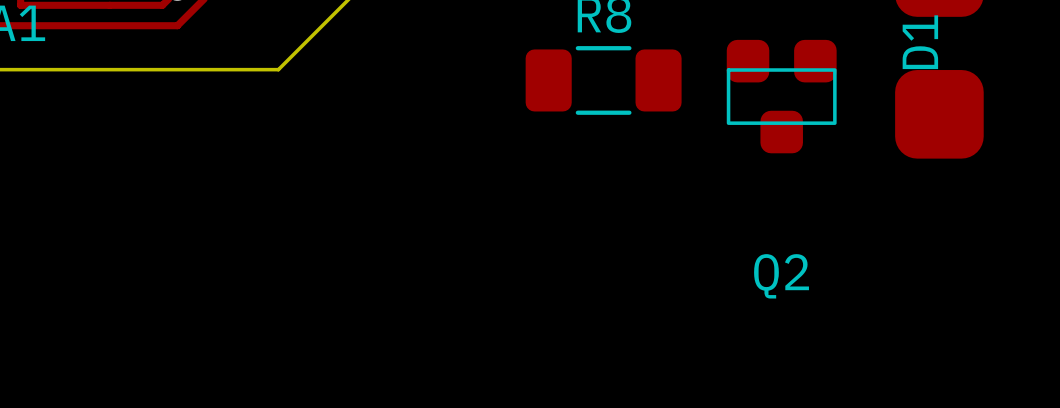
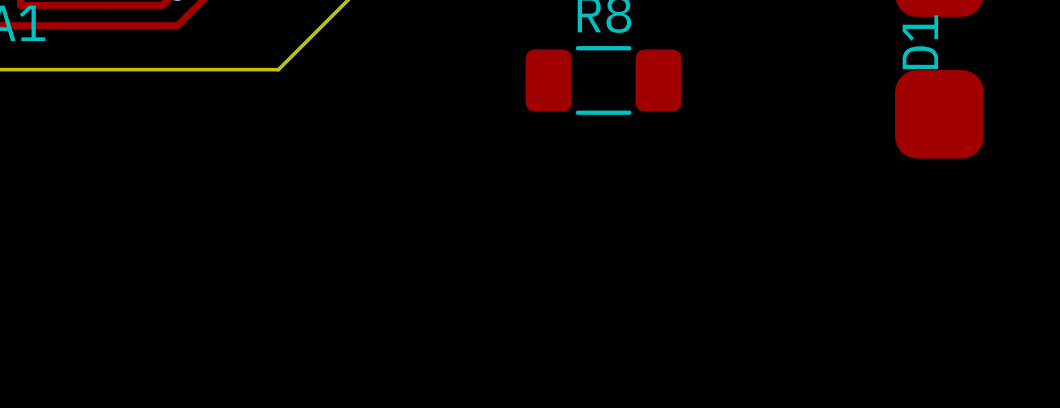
Q2: (781, 96) -> none

